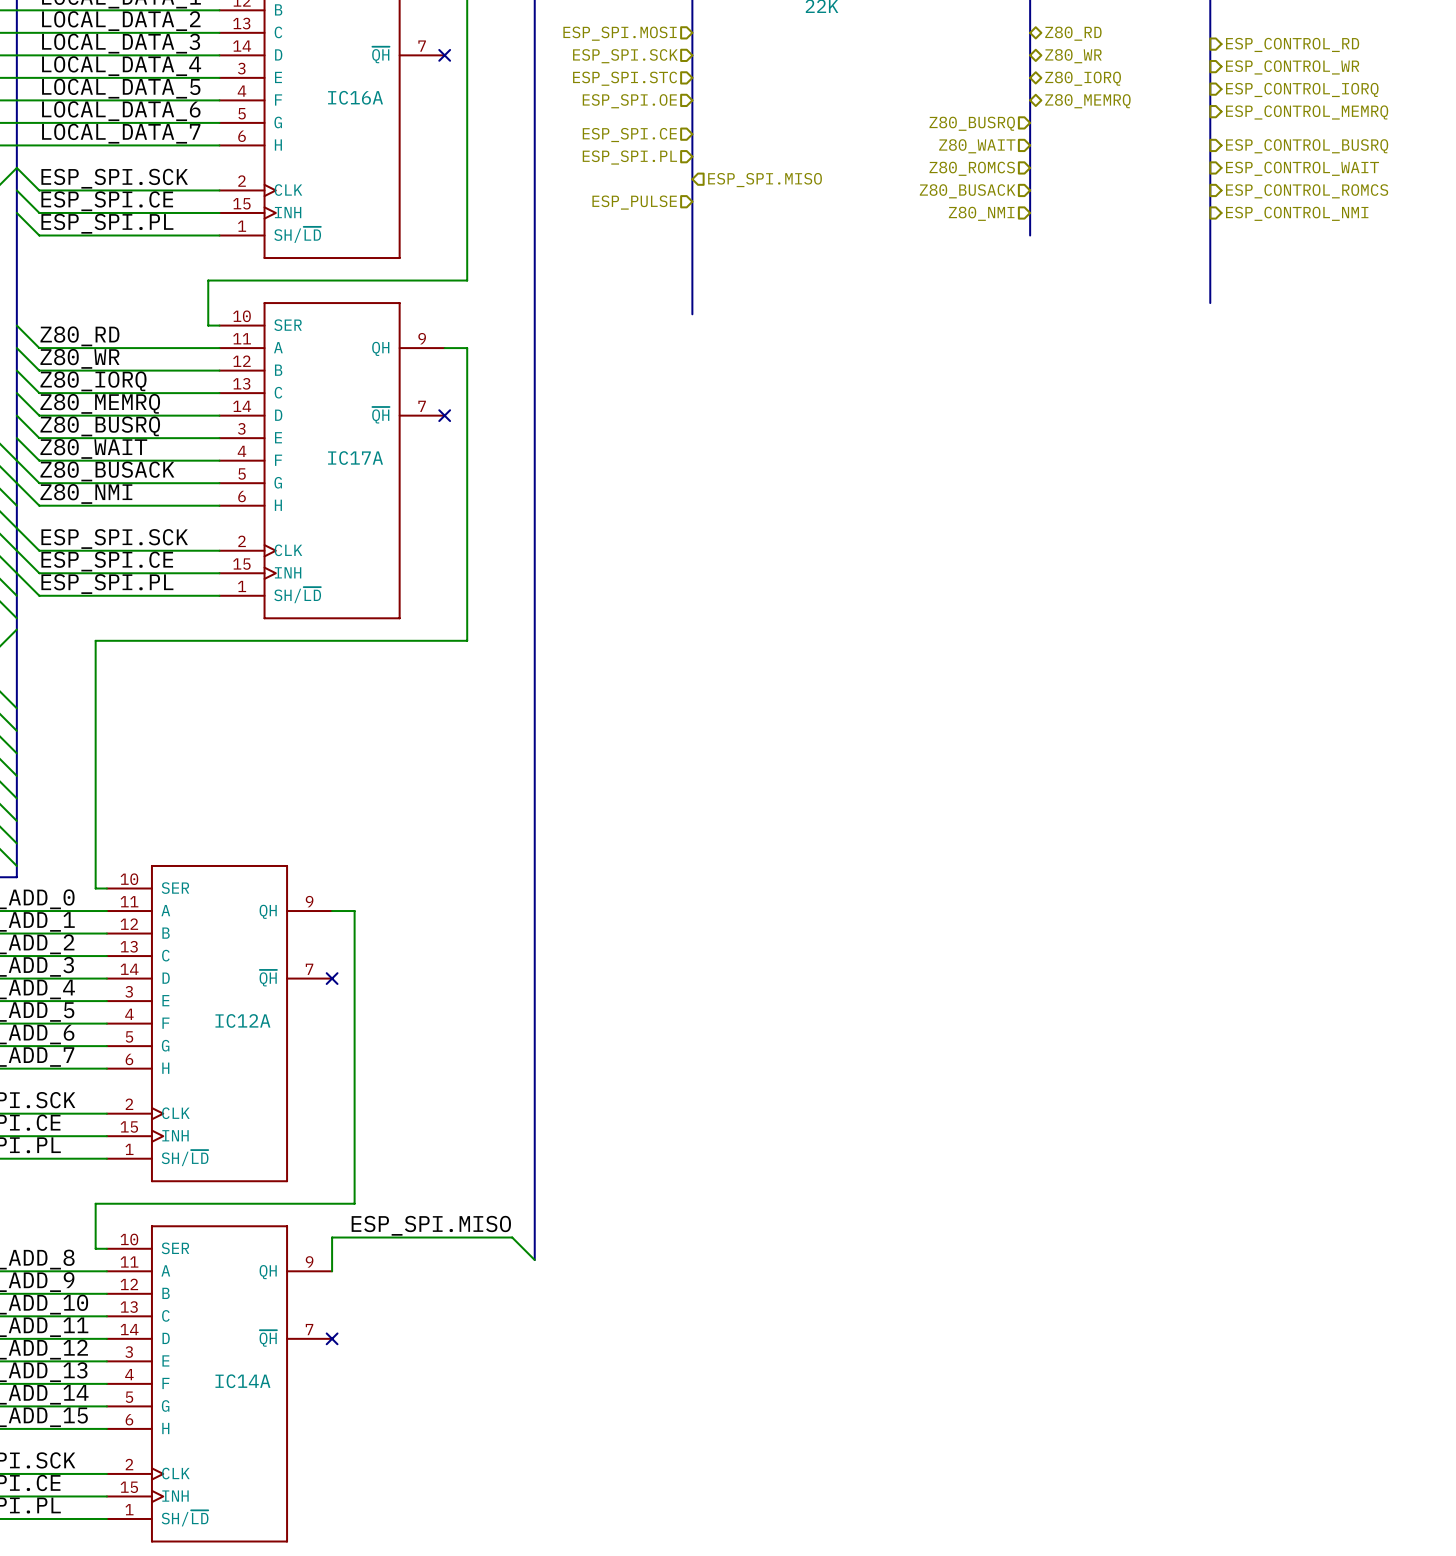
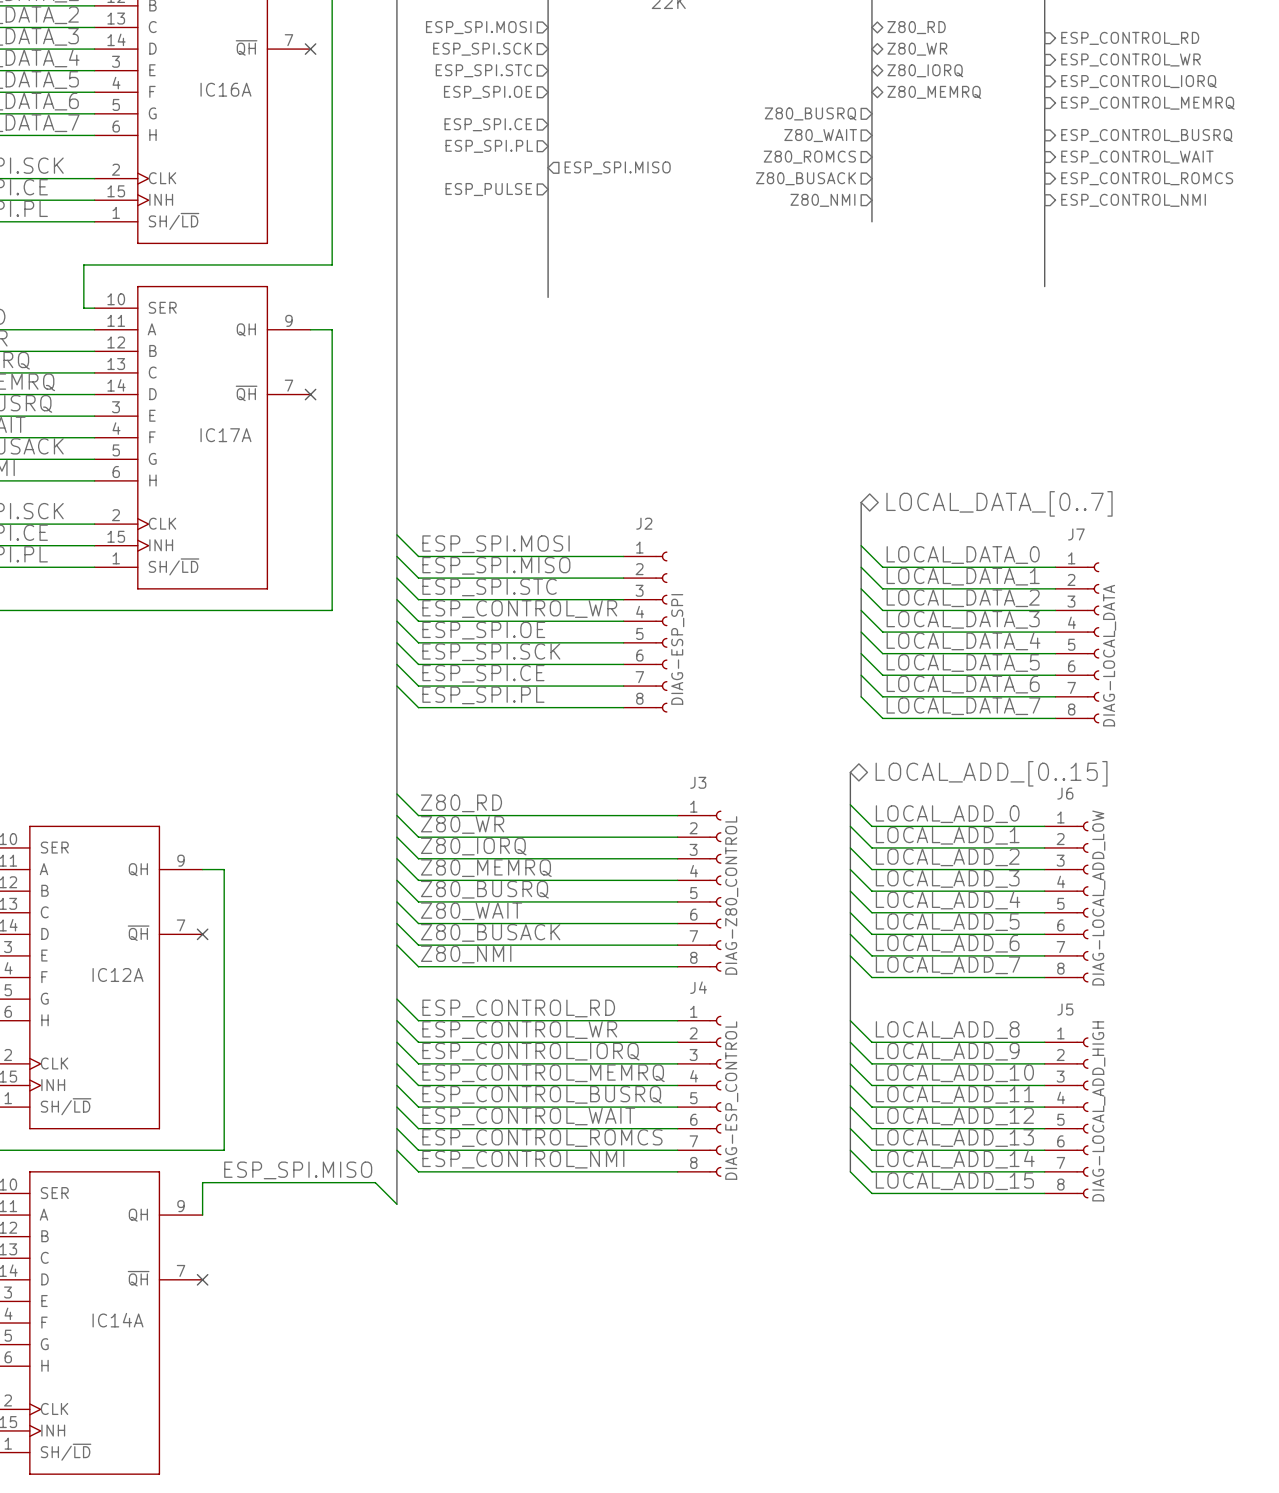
bus: none -> (861, 502) (861, 696)
hierarchical label: none -> LOCAL_DATA_[0..7] (999, 503)
wire: none -> (396, 534) (418, 556) (623, 556)
label: none -> ESP_SPI.MOSI (496, 544)
wire: none -> (861, 545) (882, 567) (1055, 567)
wire: none -> (396, 556) (418, 578) (623, 578)
label: none -> LOCAL_DATA_0 (963, 555)
label: none -> ESP_SPI.MISO (496, 565)
wire: none -> (861, 567) (882, 588) (1055, 588)
label: none -> LOCAL_DATA_1 (963, 576)
wire: none -> (396, 578) (418, 599) (623, 599)
label: none -> ESP_SPI.STC (489, 587)
wire: none -> (861, 588) (882, 610) (1055, 610)
wire: none -> (396, 599) (418, 621) (623, 621)
label: none -> LOCAL_DATA_2 (963, 598)
label: none -> ESP_CONTROL_WR (519, 609)
wire: none -> (861, 610) (882, 632) (1055, 632)
label: none -> LOCAL_DATA_3 (963, 619)
wire: none -> (396, 621) (418, 642) (623, 642)
label: none -> ESP_SPI.OE (483, 630)
J2: none -> DIAG-ESP_SPI (645, 632)
wire: none -> (861, 632) (882, 653) (1055, 653)
wire: none -> (396, 642) (418, 664) (623, 664)
label: none -> LOCAL_DATA_4 (963, 641)
J7: none -> DIAG-LOCAL_DATA (1077, 642)
label: none -> ESP_SPI.SCK (491, 652)
wire: none -> (861, 653) (882, 675) (1055, 675)
label: none -> LOCAL_DATA_5 (963, 662)
wire: none -> (396, 664) (418, 686) (623, 686)
label: none -> ESP_SPI.CE (483, 673)
wire: none -> (861, 675) (882, 696) (1055, 696)
wire: none -> (396, 686) (418, 707) (623, 707)
label: none -> LOCAL_DATA_6 (963, 684)
label: none -> ESP_SPI.PL (483, 695)
wire: none -> (861, 696) (882, 718) (1055, 718)
label: none -> LOCAL_DATA_7 (963, 706)
bus: none -> (850, 772) (850, 1171)
hierarchical label: none -> LOCAL_ADD_[0..15] (991, 773)
wire: none -> (396, 793) (418, 815) (677, 815)
label: none -> Z80_RD (461, 803)
wire: none -> (850, 804) (871, 826) (1044, 826)
wire: none -> (396, 815) (418, 837) (677, 837)
label: none -> LOCAL_ADD_0 (947, 814)
label: none -> Z80_WR (462, 824)
wire: none -> (850, 826) (871, 847) (1044, 847)
label: none -> LOCAL_ADD_1 (947, 835)
wire: none -> (396, 837) (418, 858) (677, 858)
label: none -> Z80_IORQ (473, 846)
wire: none -> (850, 847) (871, 869) (1044, 869)
wire: none -> (396, 858) (418, 880) (677, 880)
label: none -> LOCAL_ADD_2 (947, 857)
label: none -> Z80_MEMRQ (486, 868)
wire: none -> (850, 869) (871, 891) (1044, 891)
label: none -> LOCAL_ADD_3 (947, 878)
wire: none -> (396, 880) (418, 901) (677, 901)
label: none -> Z80_BUSRQ (484, 889)
J3: none -> DIAG-Z80_CONTROL (699, 891)
wire: none -> (850, 891) (871, 912) (1044, 912)
wire: none -> (396, 901) (418, 923) (677, 923)
label: none -> LOCAL_ADD_4 (948, 900)
J6: none -> DIAG-LOCAL_ADD_LOW (1066, 901)
label: none -> Z80_WAIT (471, 911)
wire: none -> (850, 912) (871, 934) (1044, 934)
label: none -> LOCAL_ADD_5 (947, 922)
wire: none -> (396, 923) (418, 945) (677, 945)
label: none -> Z80_BUSACK (490, 932)
wire: none -> (850, 934) (871, 955) (1044, 955)
wire: none -> (396, 945) (418, 966) (677, 966)
label: none -> LOCAL_ADD_6 (947, 943)
label: none -> Z80_NMI (466, 954)
wire: none -> (850, 955) (871, 977) (1044, 977)
label: none -> LOCAL_ADD_7 (948, 965)
wire: none -> (396, 999) (418, 1020) (677, 1020)
label: none -> ESP_CONTROL_RD (518, 1008)
wire: none -> (396, 1020) (418, 1042) (677, 1042)
wire: none -> (850, 1020) (871, 1042) (1044, 1042)
label: none -> ESP_CONTROL_WR (519, 1030)
label: none -> LOCAL_ADD_8 (947, 1030)
wire: none -> (396, 1042) (418, 1063) (677, 1063)
wire: none -> (850, 1042) (871, 1063) (1044, 1063)
label: none -> ESP_CONTROL_IORQ (530, 1051)
label: none -> LOCAL_ADD_9 (947, 1051)
wire: none -> (396, 1063) (418, 1085) (677, 1085)
wire: none -> (850, 1063) (871, 1085) (1044, 1085)
label: none -> ESP_CONTROL_MEMRQ (543, 1073)
label: none -> LOCAL_ADD_10 (954, 1073)
wire: none -> (396, 1085) (418, 1107) (677, 1107)
wire: none -> (850, 1085) (871, 1107) (1044, 1107)
label: none -> ESP_CONTROL_BUSRQ (542, 1094)
label: none -> LOCAL_ADD_11 (954, 1094)
J4: none -> DIAG-ESP_CONTROL (699, 1096)
wire: none -> (396, 1107) (418, 1128) (677, 1128)
wire: none -> (850, 1107) (871, 1128) (1044, 1128)
label: none -> ESP_CONTROL_WAIT (528, 1116)
label: none -> LOCAL_ADD_12 (954, 1116)
J5: none -> DIAG-LOCAL_ADD_HIGH (1066, 1117)
wire: none -> (396, 1128) (418, 1150) (677, 1150)
wire: none -> (850, 1128) (871, 1150) (1044, 1150)
label: none -> ESP_CONTROL_ROMCS (542, 1138)
label: none -> LOCAL_ADD_13 (954, 1138)
wire: none -> (396, 1150) (418, 1171) (677, 1171)
wire: none -> (850, 1150) (871, 1171) (1044, 1171)
label: none -> ESP_CONTROL_NMI (523, 1159)
label: none -> LOCAL_ADD_14 (955, 1159)
wire: none -> (850, 1171) (871, 1193) (1044, 1193)
label: none -> LOCAL_ADD_15 (954, 1181)

